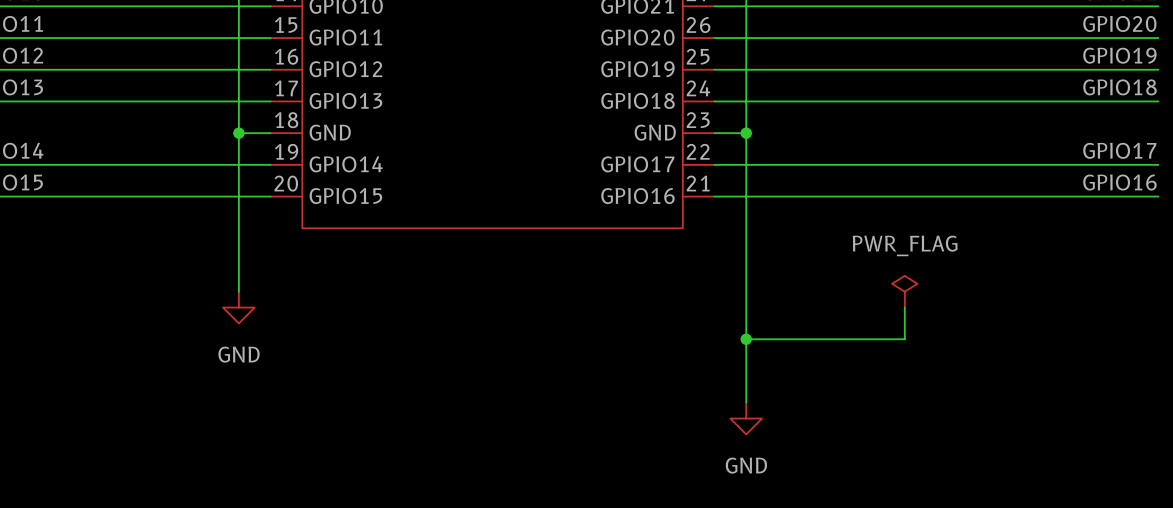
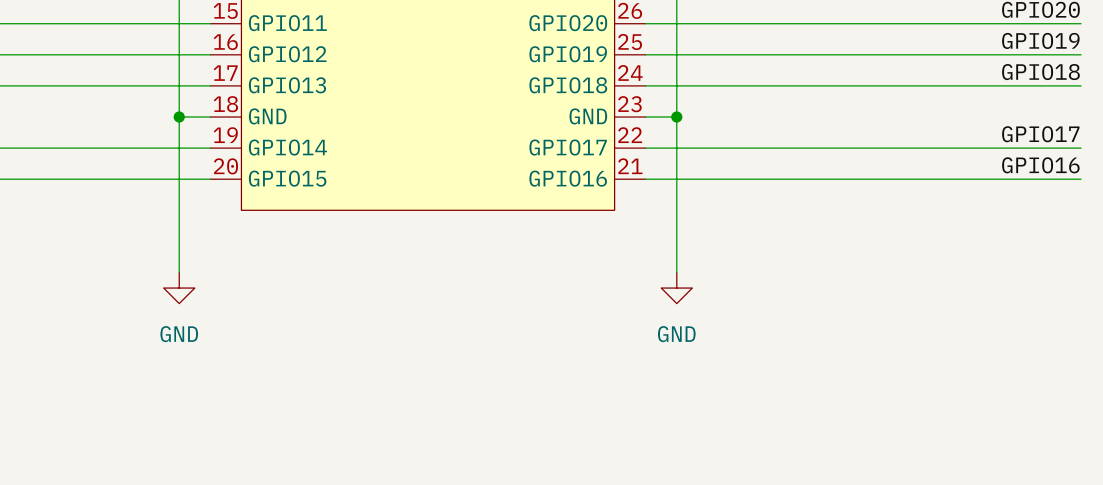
wire: (746, 291) (746, 402) -> none
power symbol: PWR_FLAG (904, 291) -> none
wire: (904, 307) (904, 339) (746, 339) -> none
junction: (746, 339) -> none
power symbol position: GND (746, 418) -> GND (676, 288)

